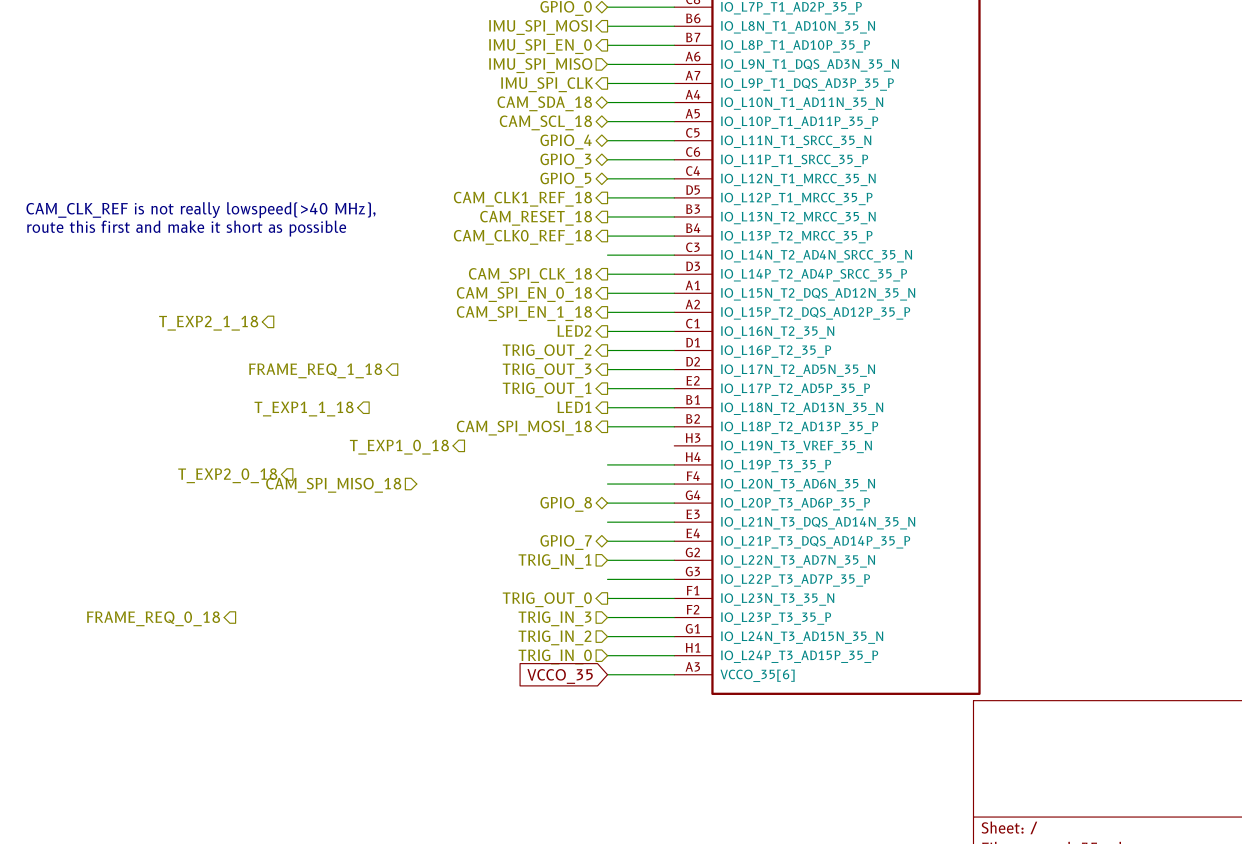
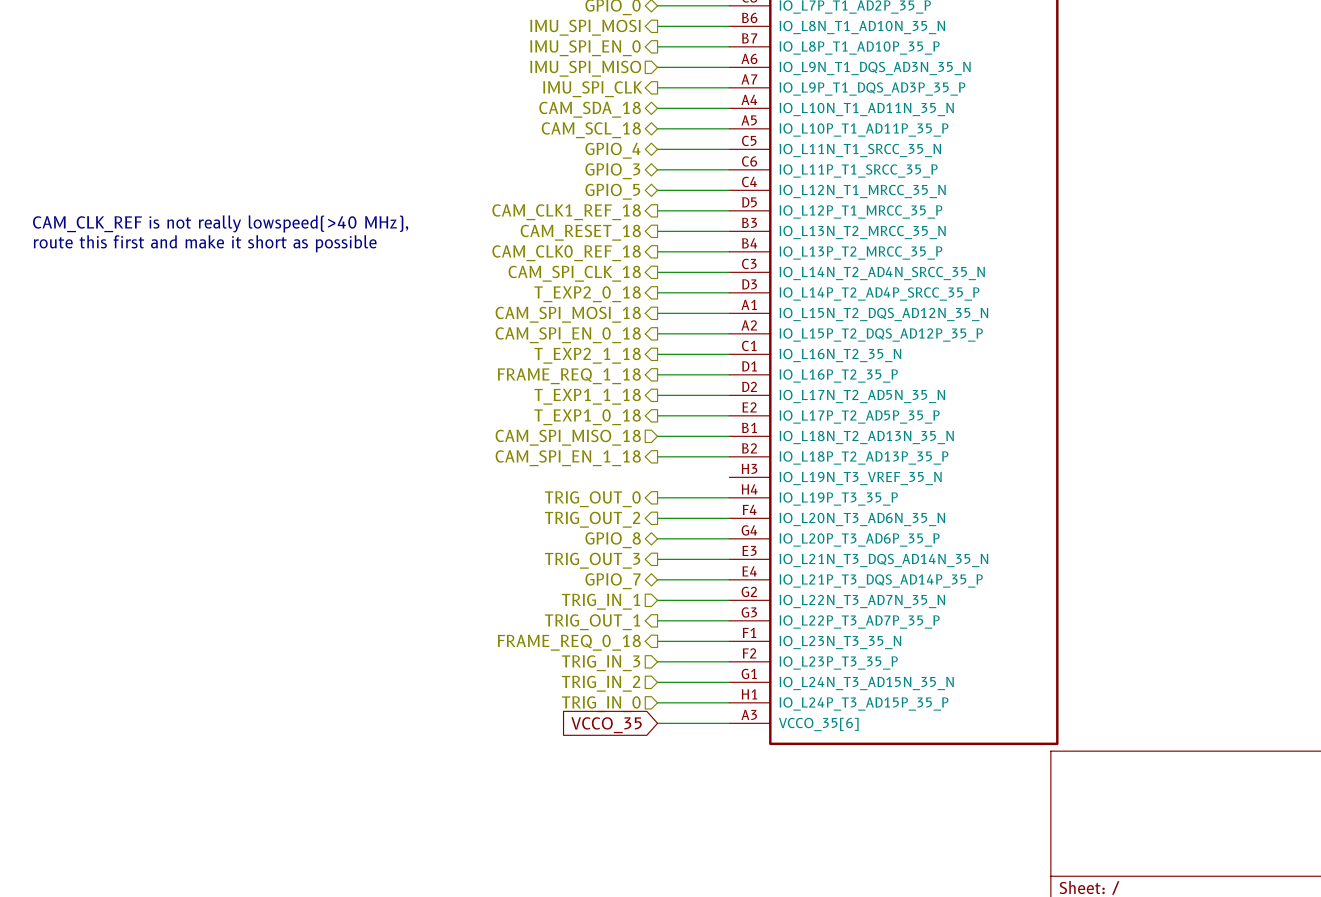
hierarchical label: none -> CAM_SPI_CLK_18 (574, 273)
hierarchical label: CAM_SPI_CLK_18 (530, 275) -> T_EXP2_0_18 (587, 294)
hierarchical label: CAM_SPI_EN_0_18 (524, 294) -> CAM_SPI_MOSI_18 (568, 314)
hierarchical label: CAM_SPI_EN_1_18 (524, 313) -> CAM_SPI_EN_0_18 (568, 335)
hierarchical label: T_EXP2_1_18 (208, 323) -> none
hierarchical label: LED2 (574, 331) -> T_EXP2_1_18 (587, 355)
hierarchical label: TRIG_OUT_2 (547, 351) -> FRAME_REQ_1_18 (569, 376)
hierarchical label: FRAME_REQ_1_18 (315, 370) -> none
hierarchical label: TRIG_OUT_3 (547, 370) -> T_EXP1_1_18 (587, 396)
hierarchical label: TRIG_OUT_1 (547, 389) -> T_EXP1_0_18 (587, 417)
hierarchical label shape: output (574, 407) -> input (568, 437)
hierarchical label: LED1 (574, 407) -> CAM_SPI_MISO_18 (568, 437)
hierarchical label: T_EXP1_1_18 (304, 409) -> none
hierarchical label: CAM_SPI_MOSI_18 (524, 428) -> CAM_SPI_EN_1_18 (568, 458)
hierarchical label: T_EXP1_0_18 (399, 447) -> none
hierarchical label: none -> TRIG_OUT_0 (592, 499)
hierarchical label: T_EXP2_0_18 (227, 475) -> none
hierarchical label: CAM_SPI_MISO_18 (333, 485) -> none
hierarchical label: none -> TRIG_OUT_2 (592, 519)
hierarchical label: none -> TRIG_OUT_3 (592, 560)
hierarchical label: none -> TRIG_OUT_1 (592, 622)
hierarchical label: TRIG_OUT_0 (547, 599) -> FRAME_REQ_0_18 (569, 642)
hierarchical label: FRAME_REQ_0_18 (153, 618) -> none

